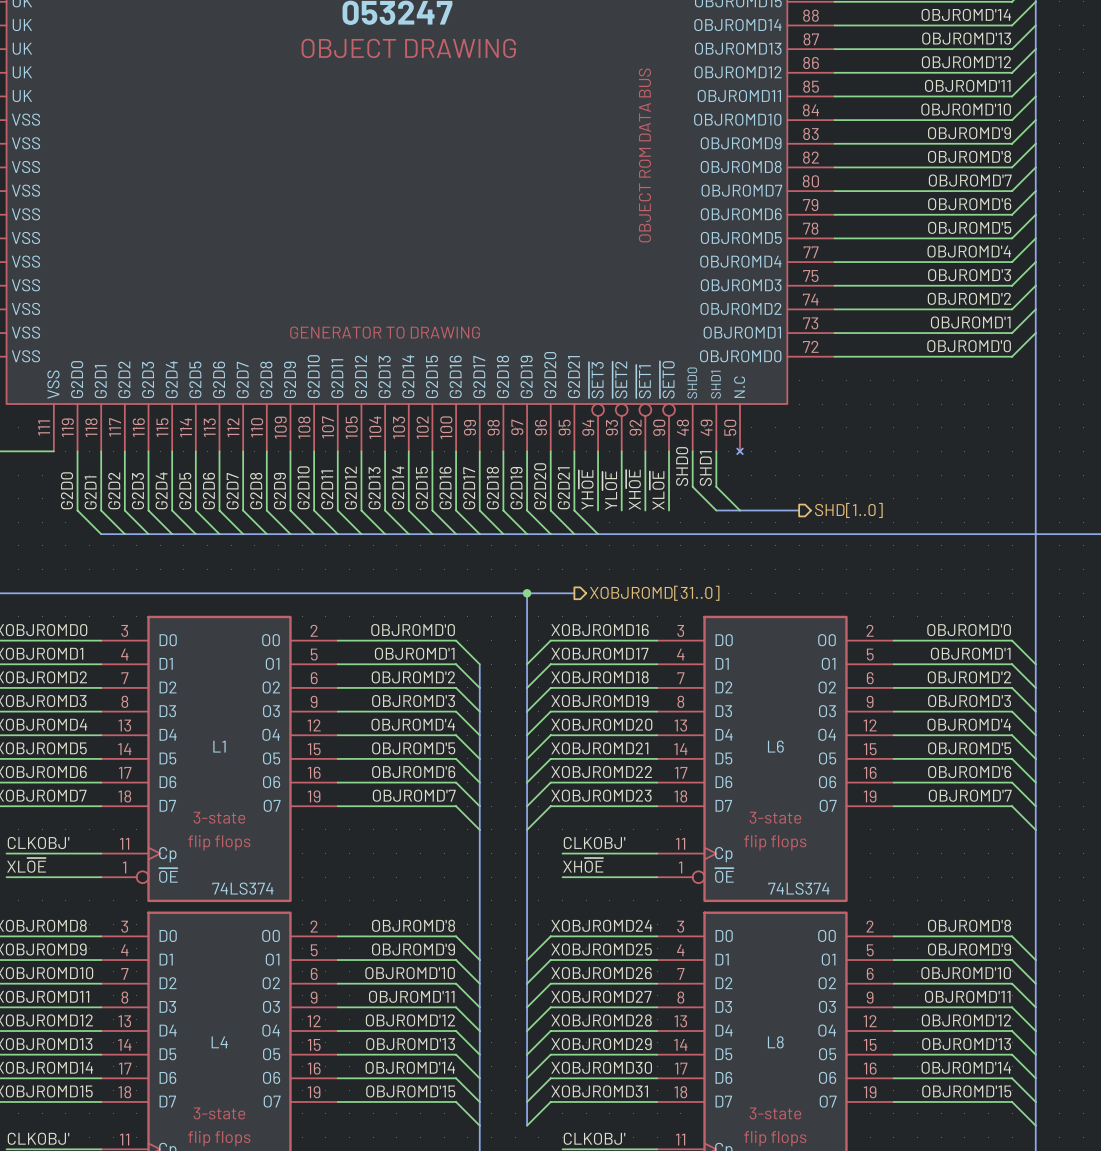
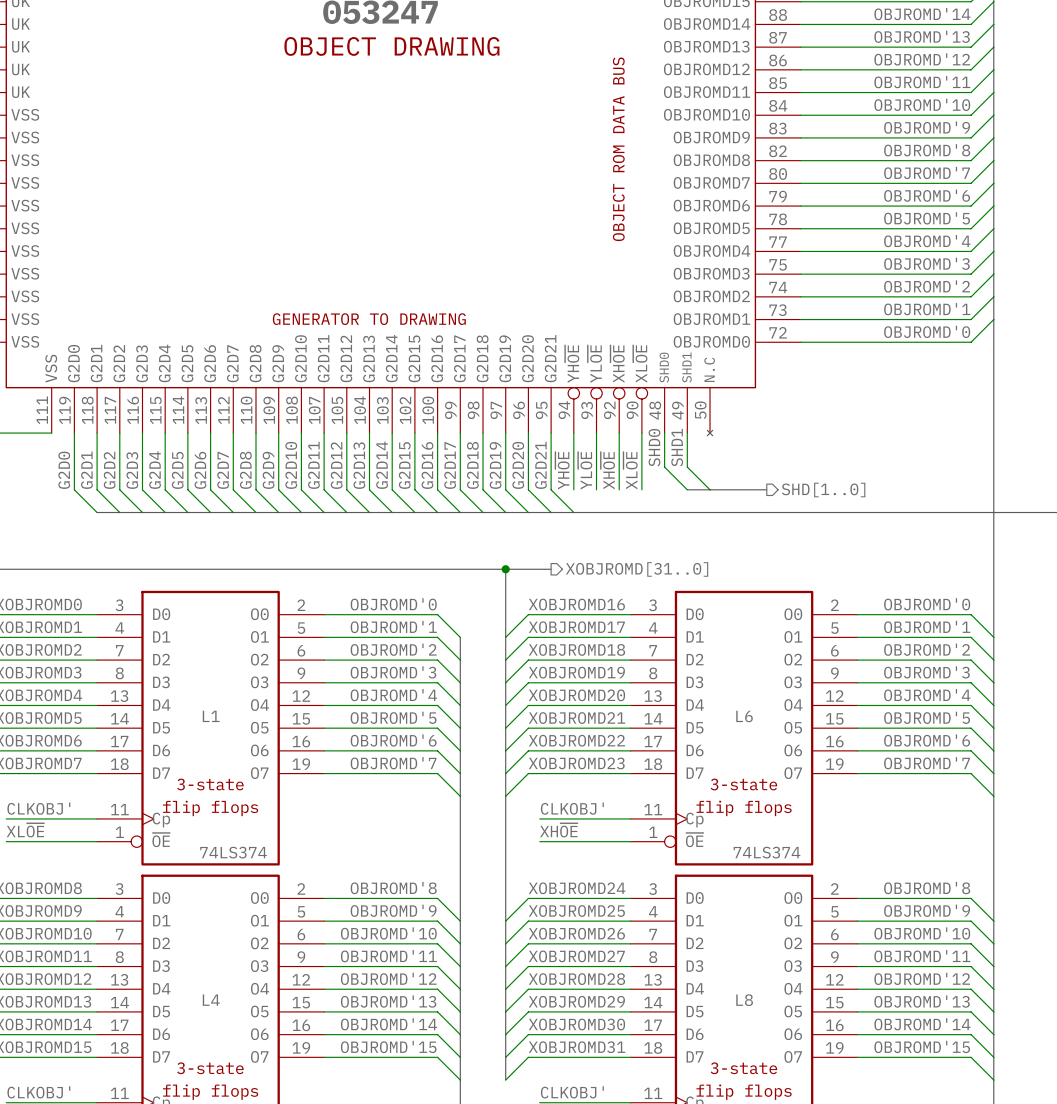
part pin name: ~{SET2} (619, 379) -> YL~{OE} (594, 364)
part pin name: ~{SET0} (667, 379) -> XL~{OE} (640, 363)
part pin name: ~{SET3} (596, 380) -> YH~{OE} (572, 364)
part pin name: ~{SET1} (643, 381) -> XH~{OE} (617, 363)

